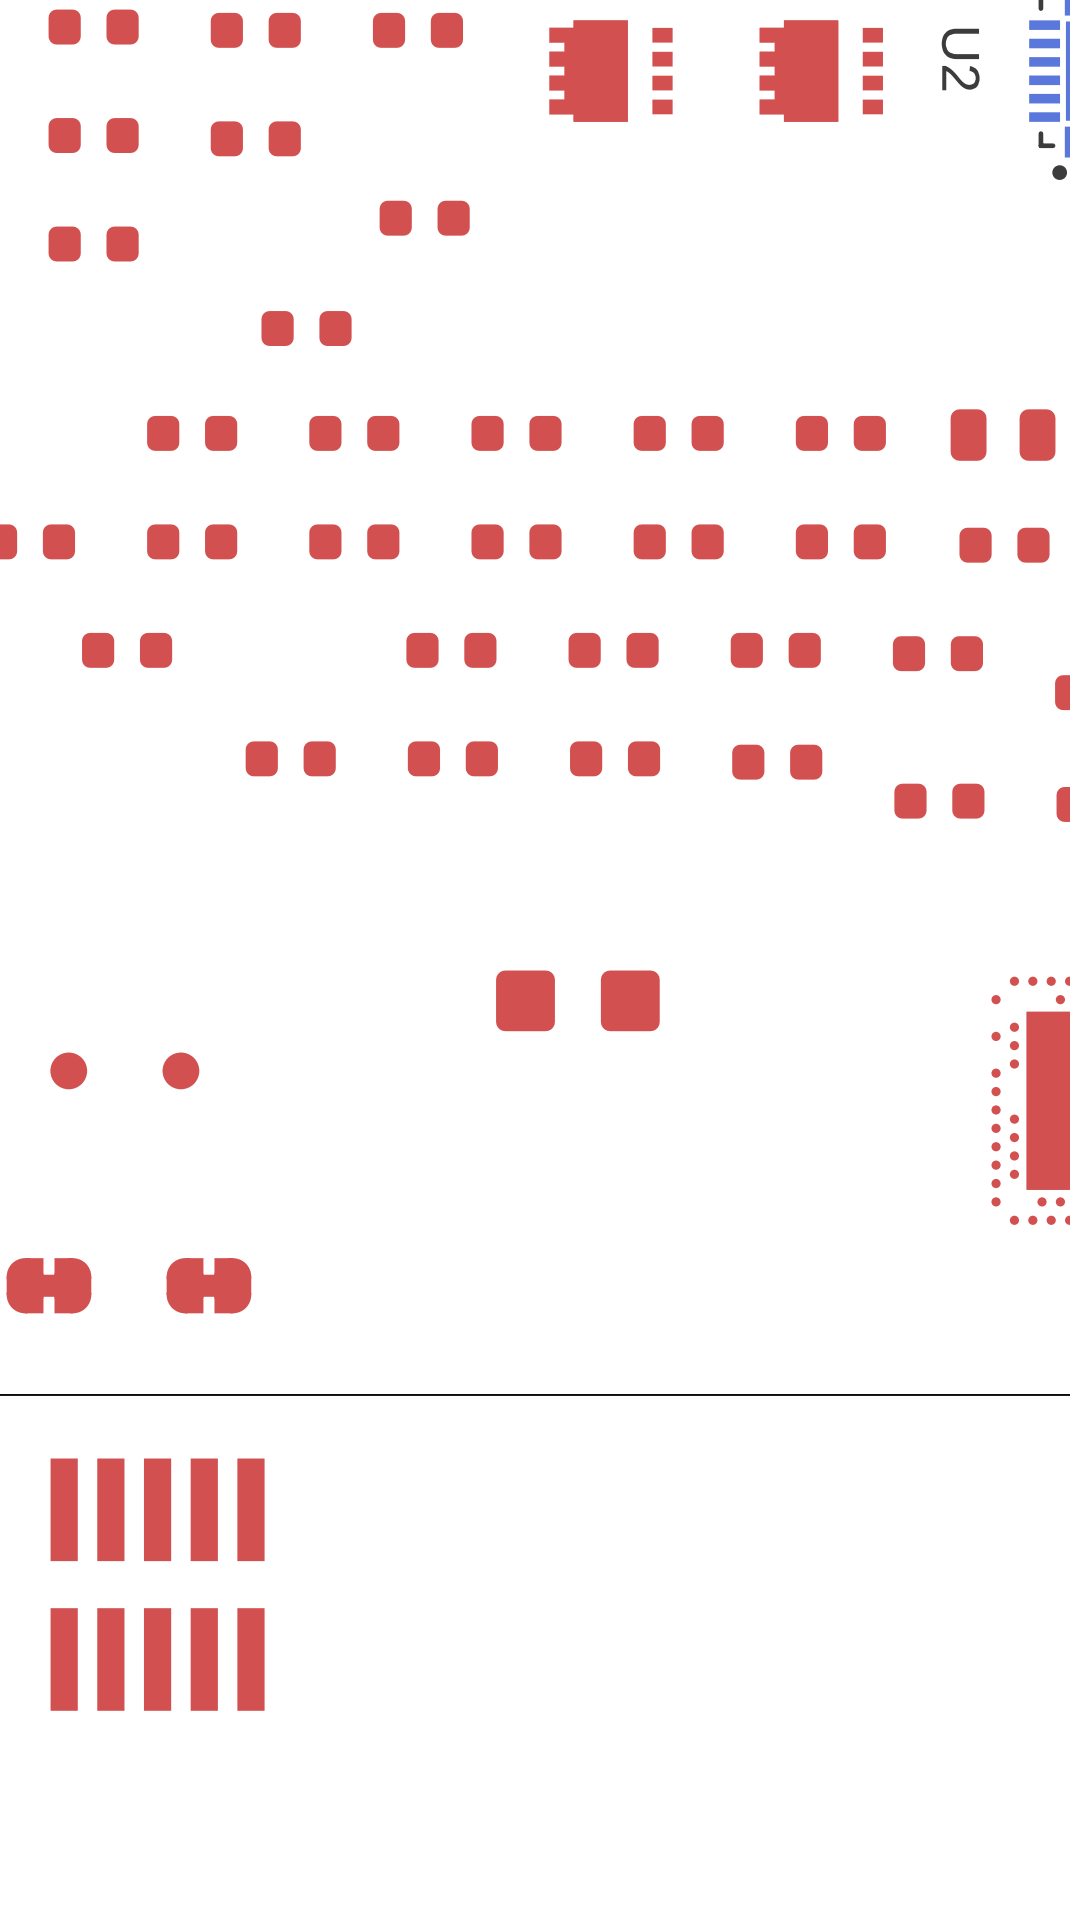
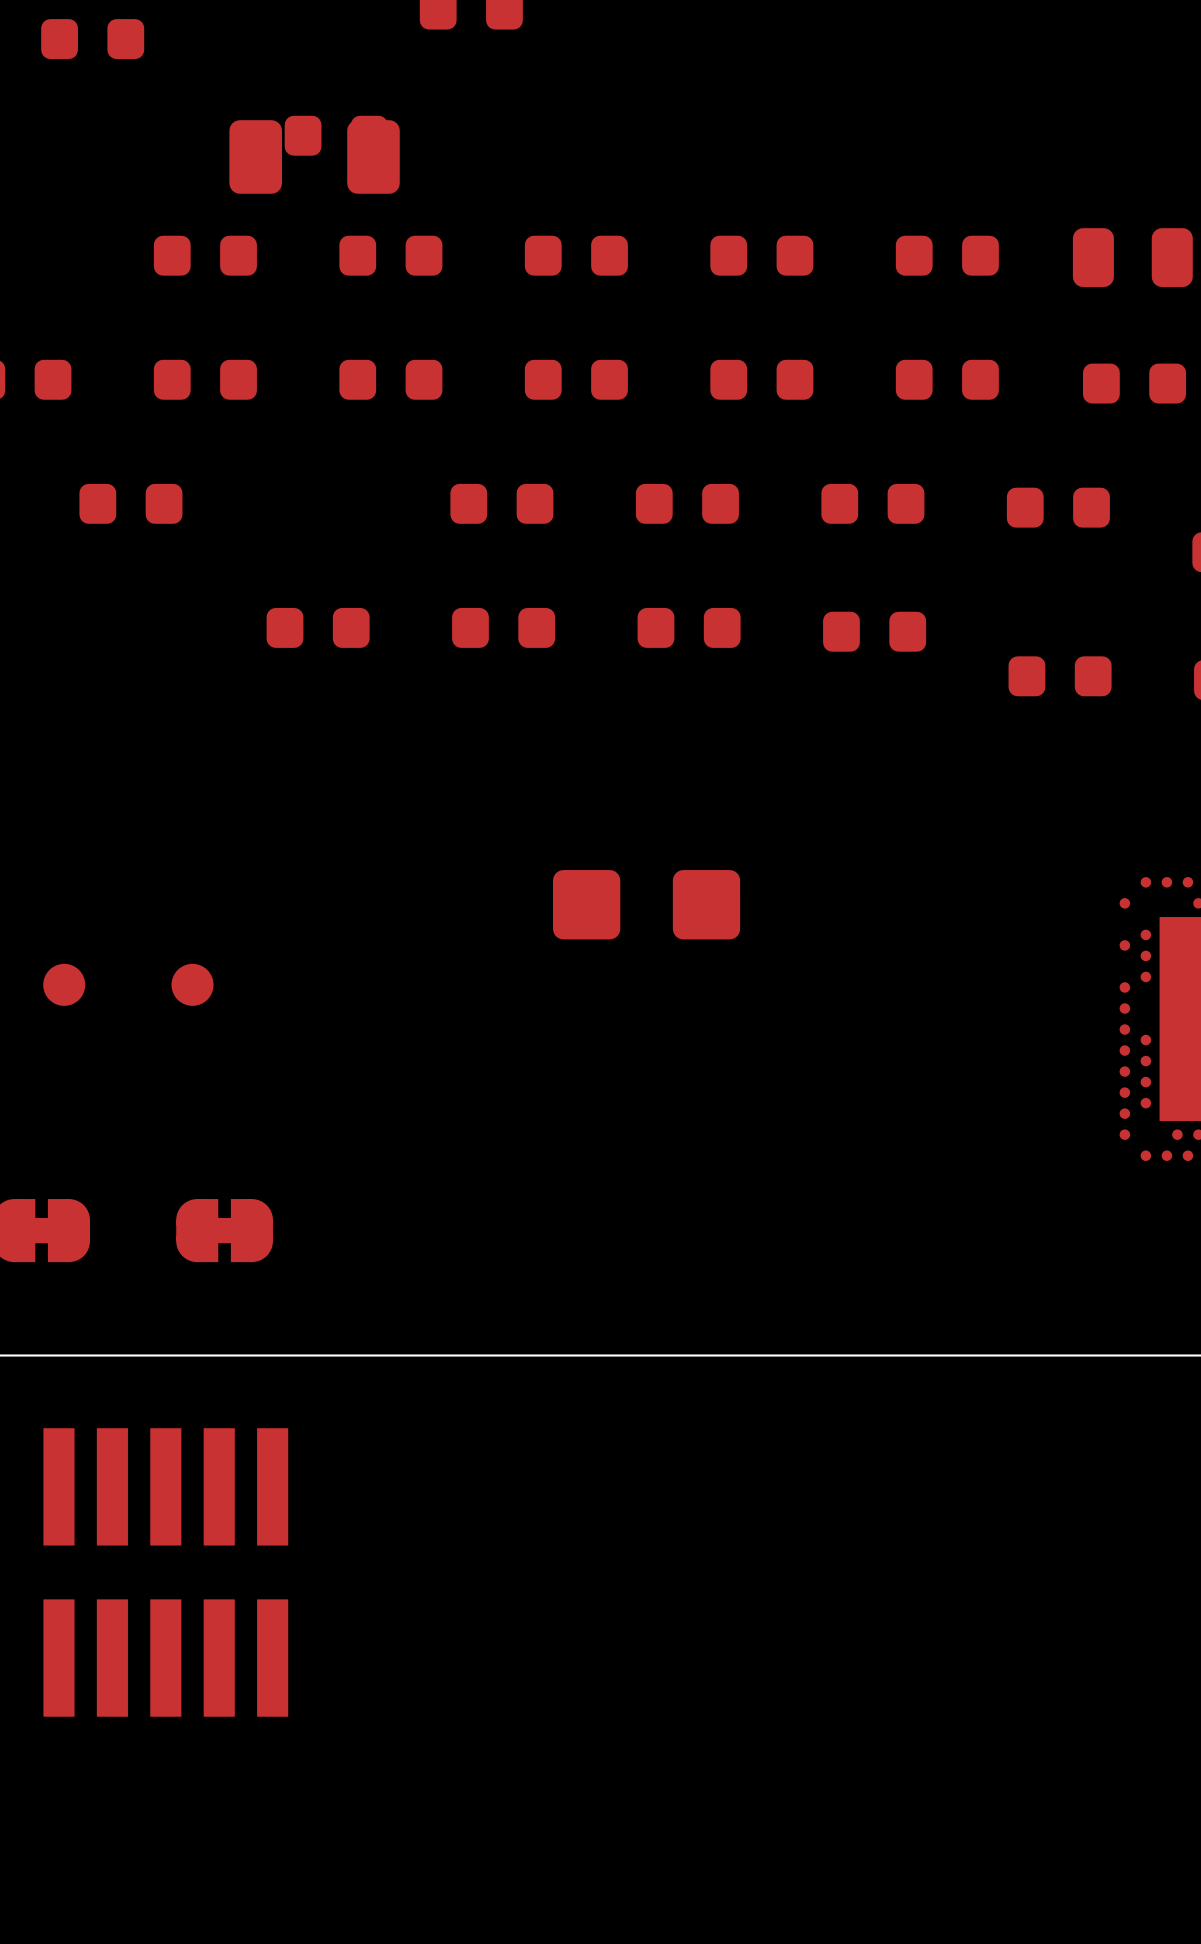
part: none -> (314, 156)

